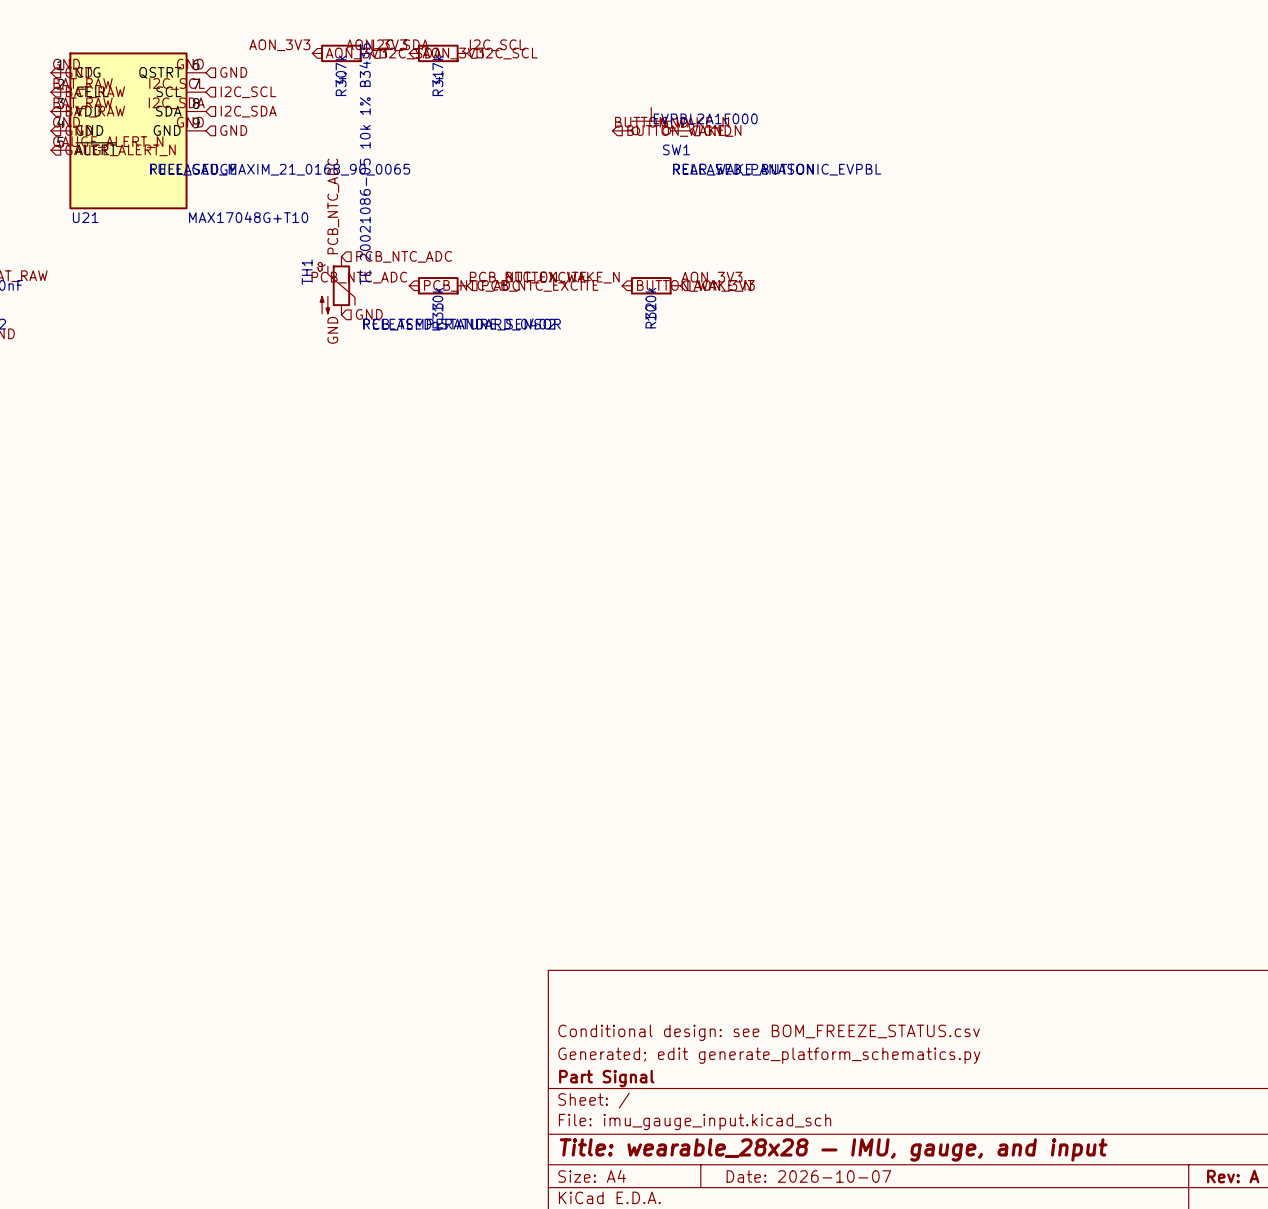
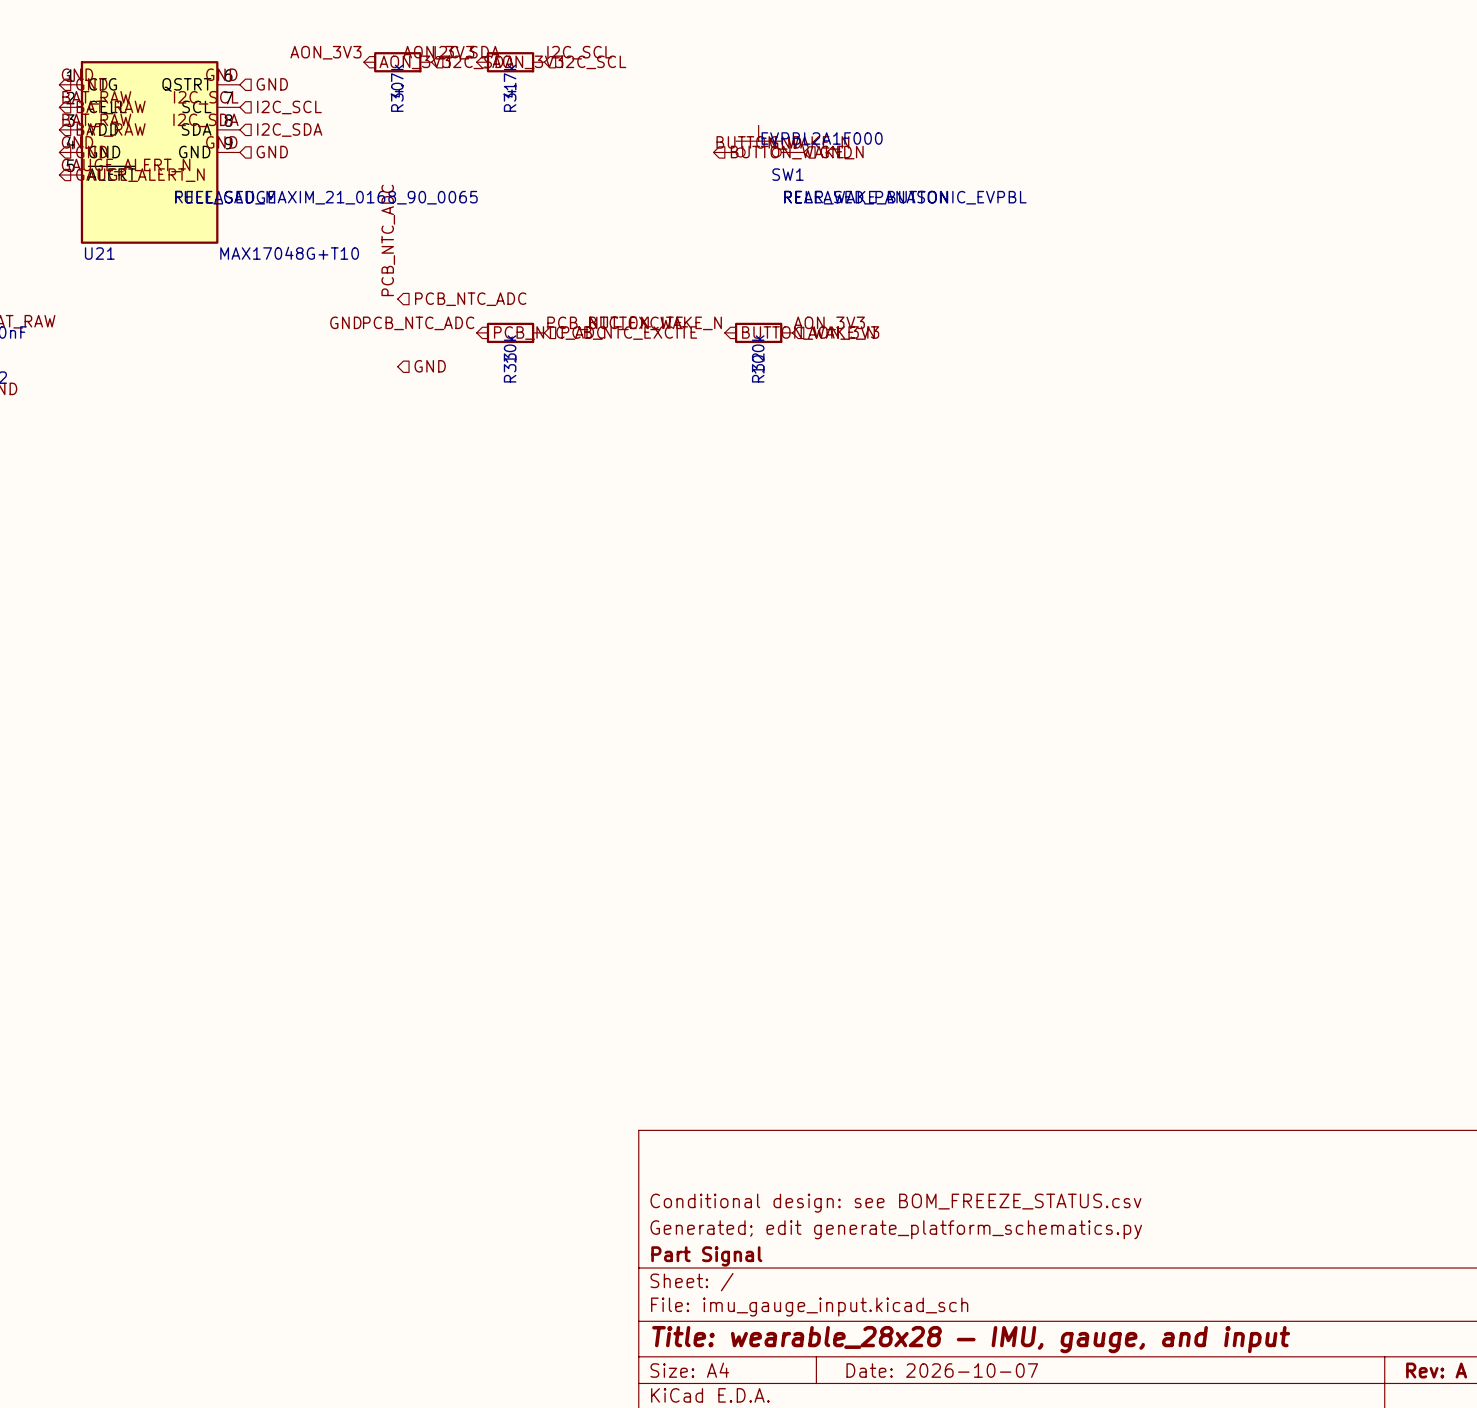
TH1: TE 20021086-05 10k 1% B3435 (336, 285) -> none
label rotation: 0° (332, 330) -> 90° clockwise (345, 322)
label position: GND (332, 330) -> GND (345, 322)

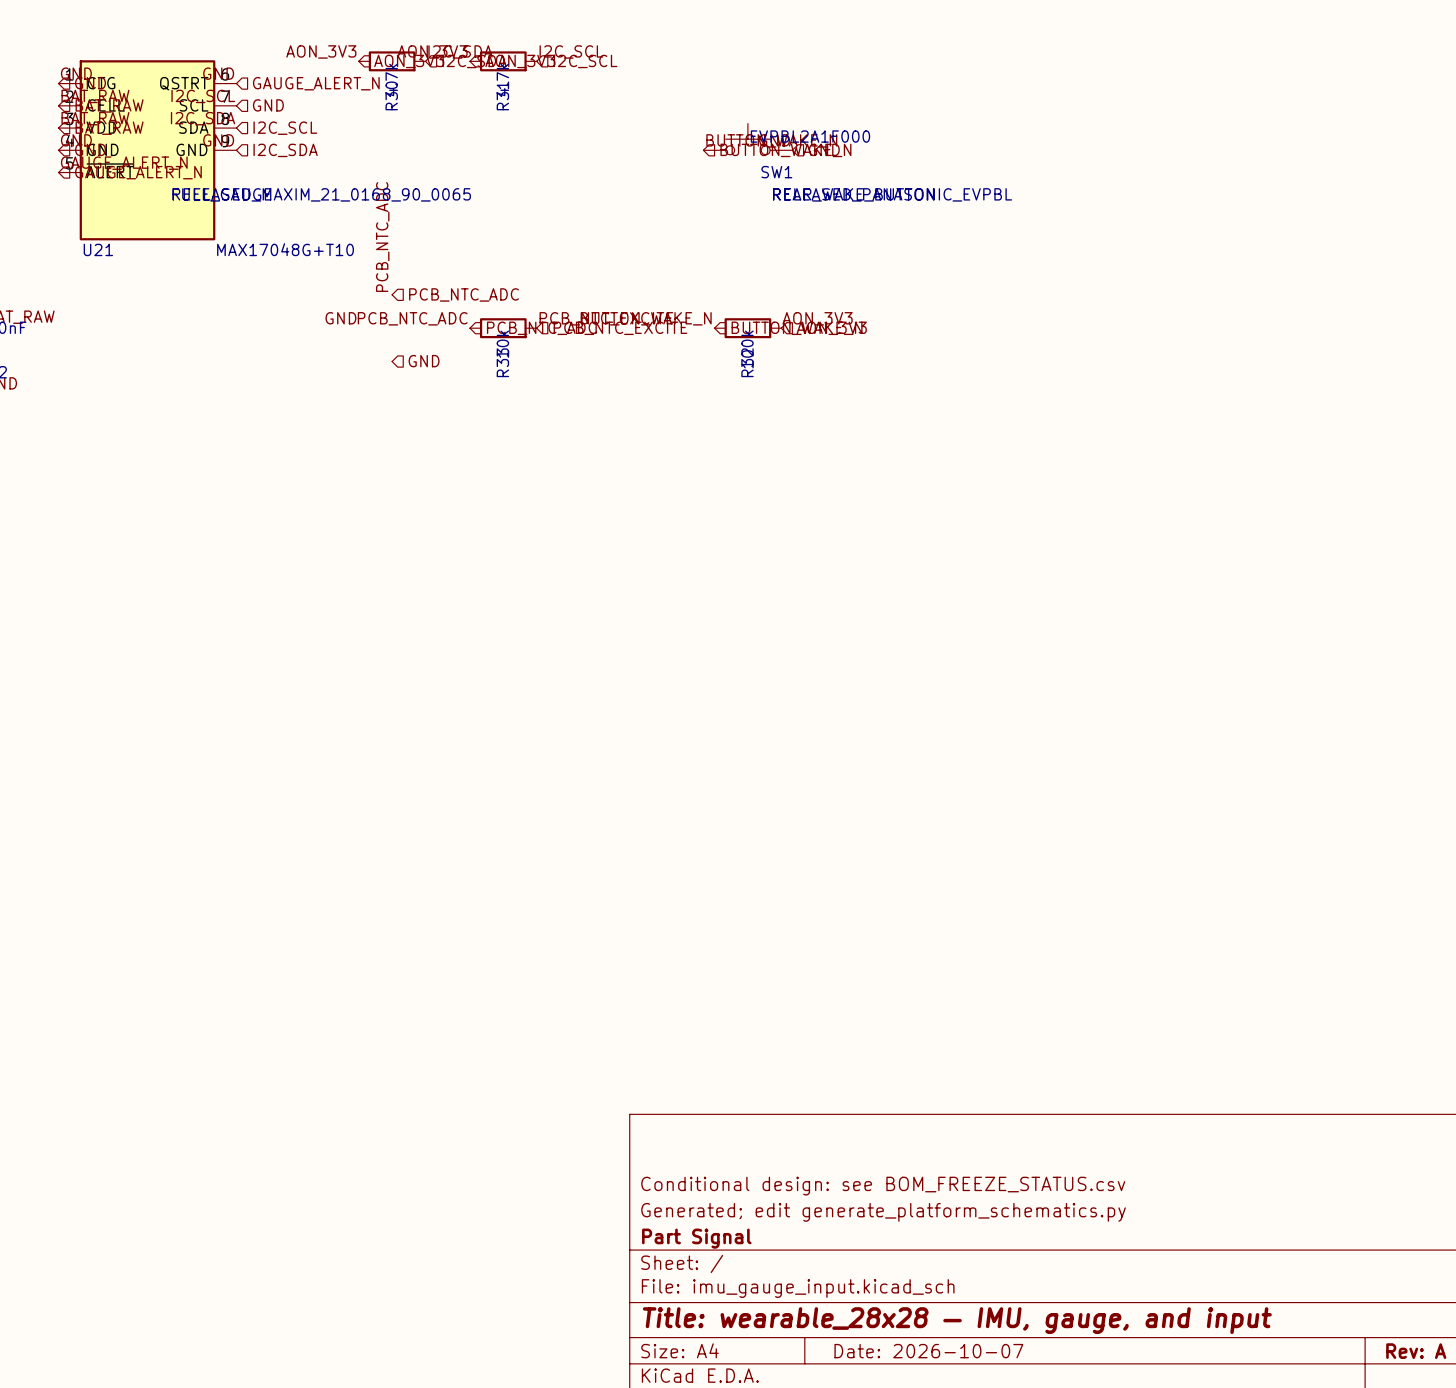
hierarchical label: GND (272, 84) -> GAUGE_ALERT_N (316, 83)
hierarchical label: I2C_SCL (289, 107) -> GND (268, 105)
hierarchical label: I2C_SDA (289, 130) -> I2C_SCL (285, 128)
hierarchical label: GND (272, 152) -> I2C_SDA (285, 150)

